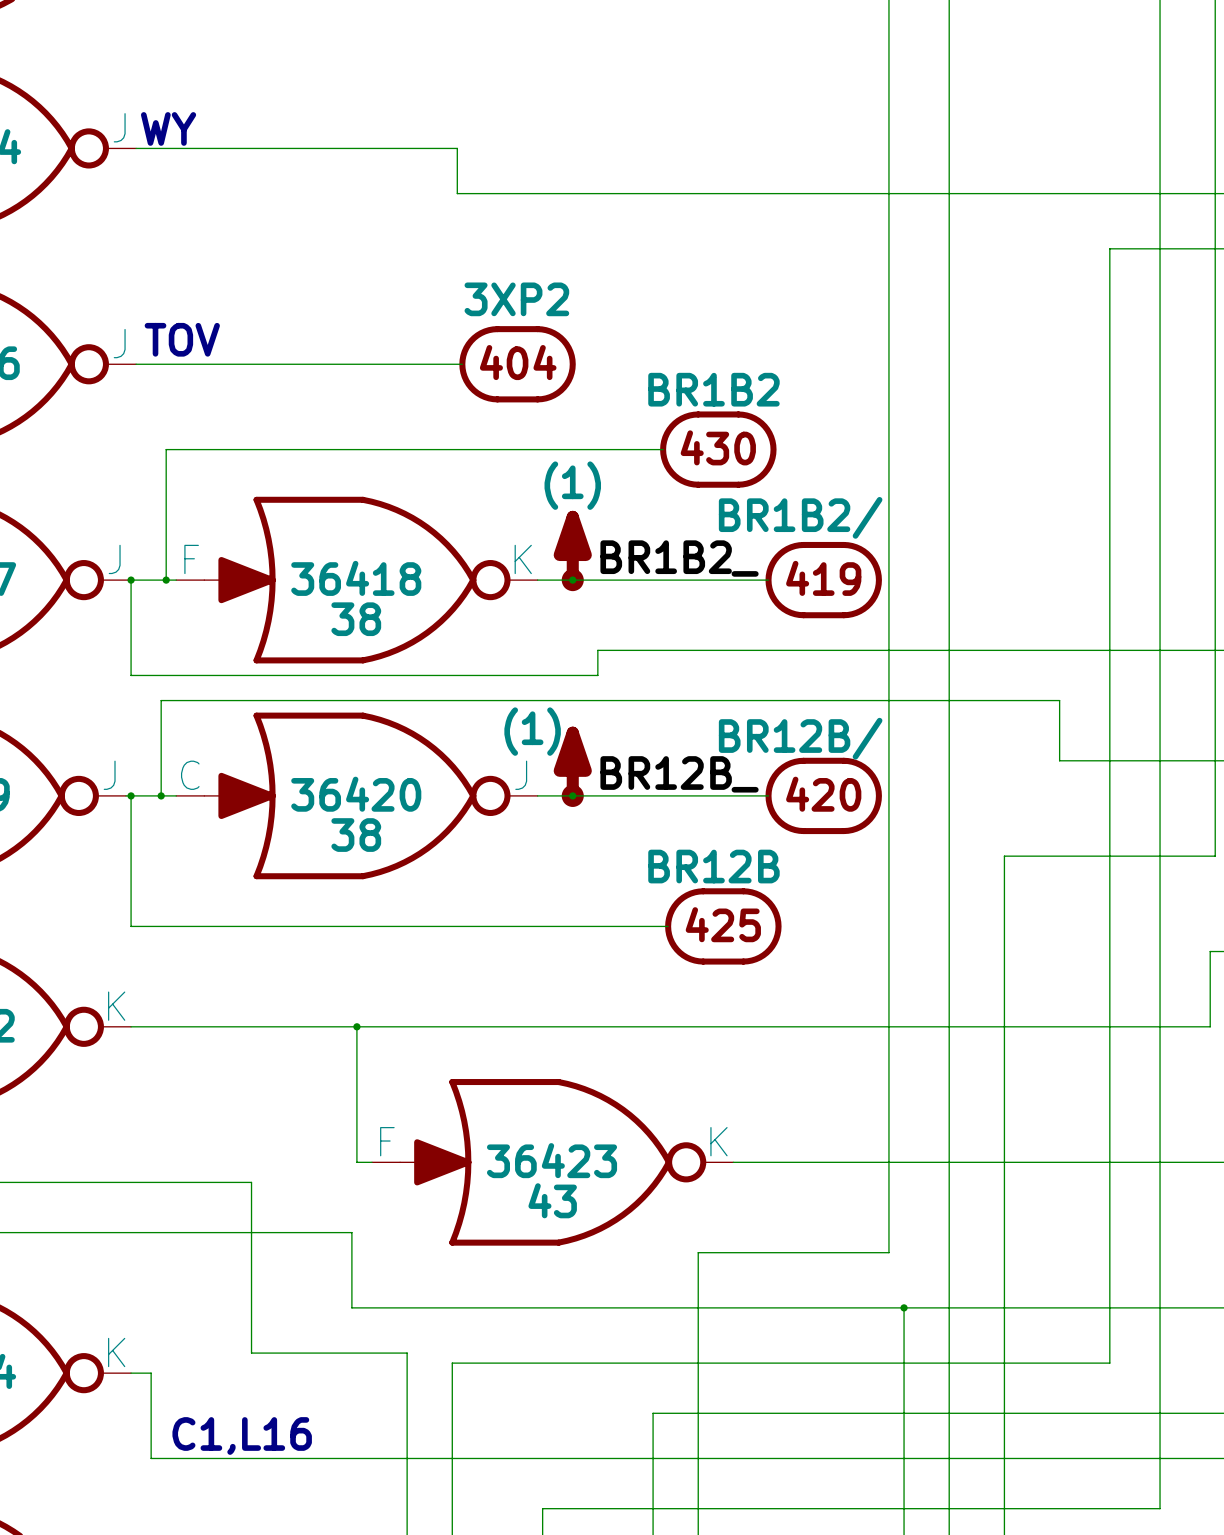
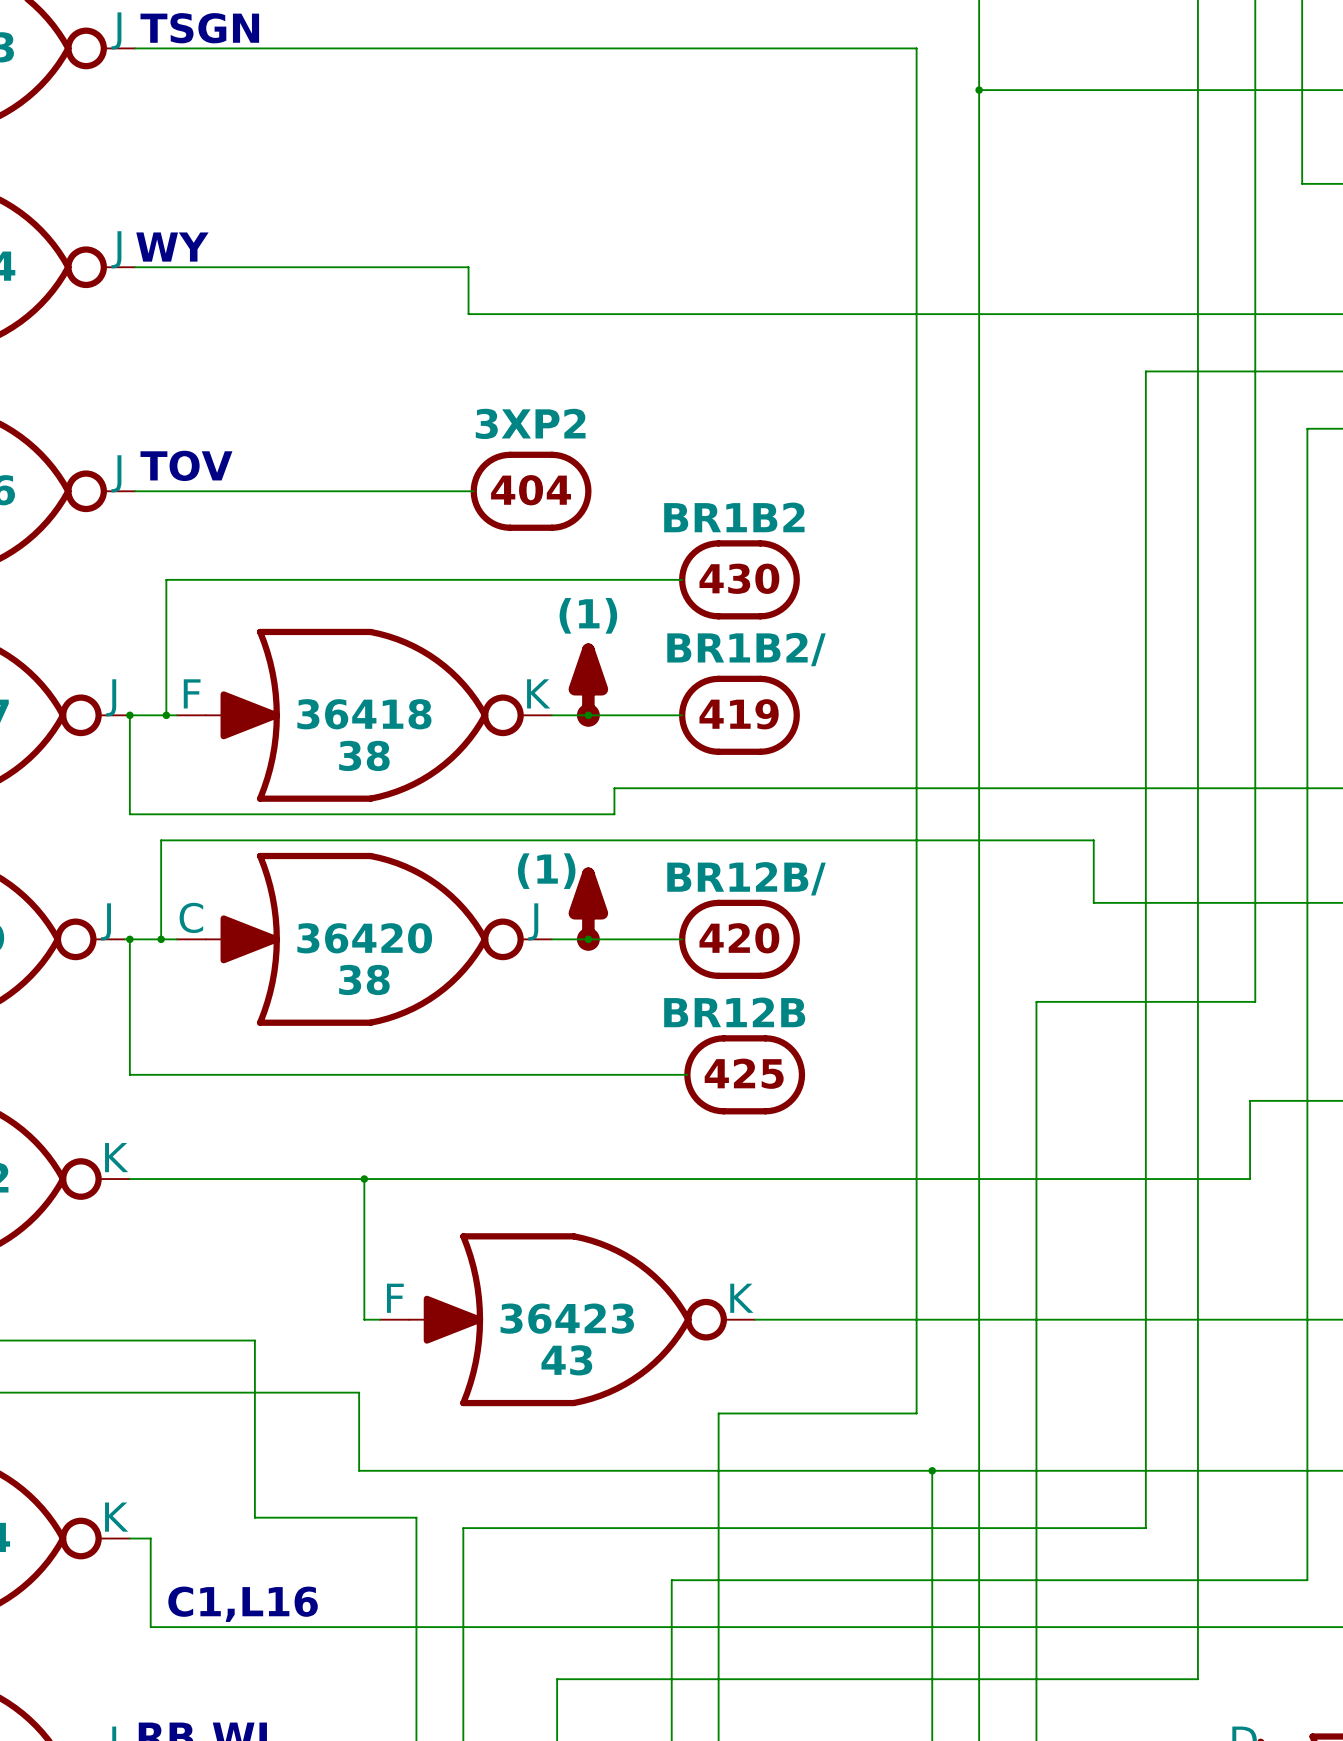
part text position: BR1B2/ (800, 517) -> BR1B2/ (746, 649)
label: BR1B2_ (679, 558) -> none
wire: (663, 580) (768, 580) -> none
part position: (823, 580) -> (739, 715)
part text position: BR12B/ (800, 738) -> BR12B/ (746, 878)
label: BR12B_ (679, 774) -> none
wire: (663, 795) (768, 795) -> none
part position: (823, 795) -> (739, 939)

